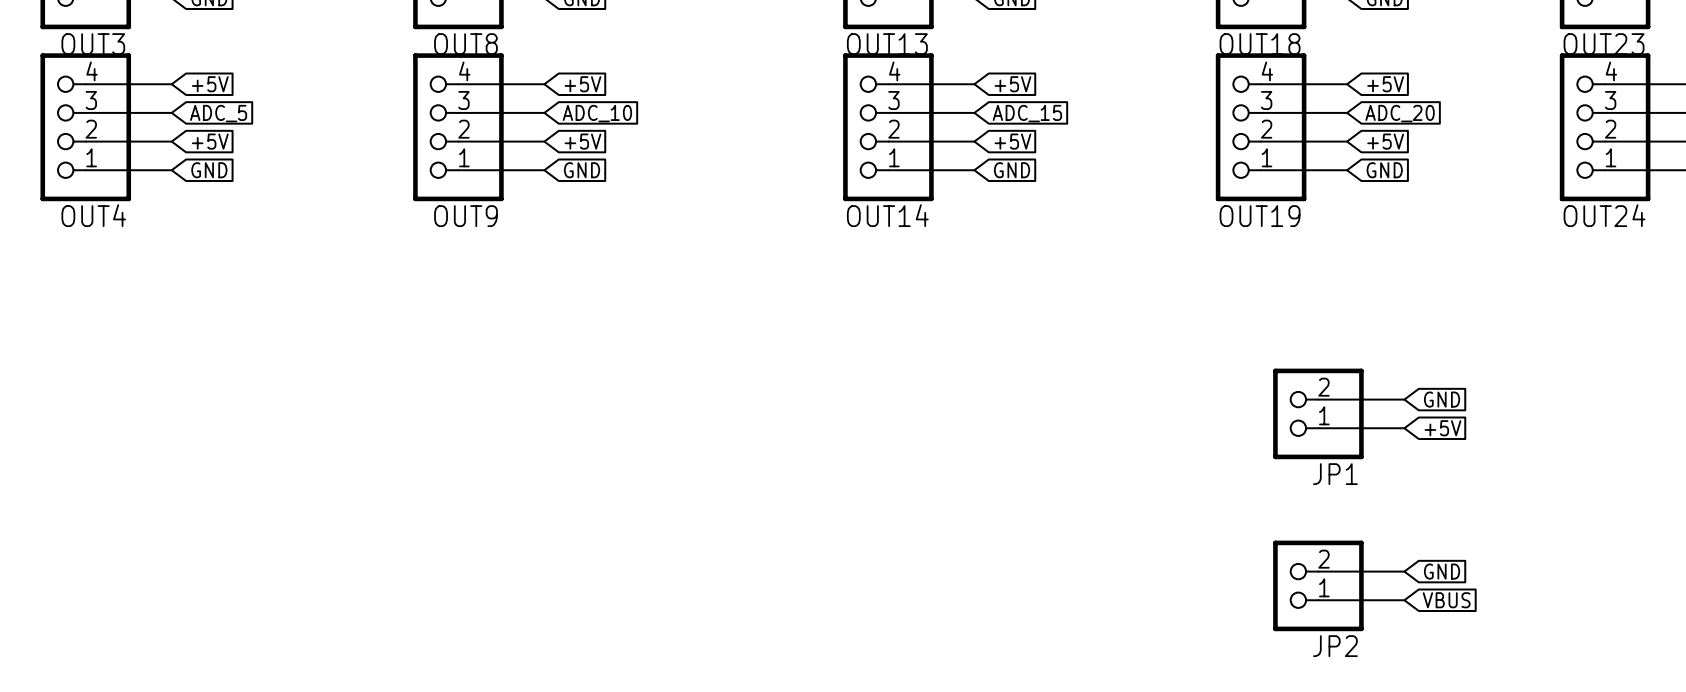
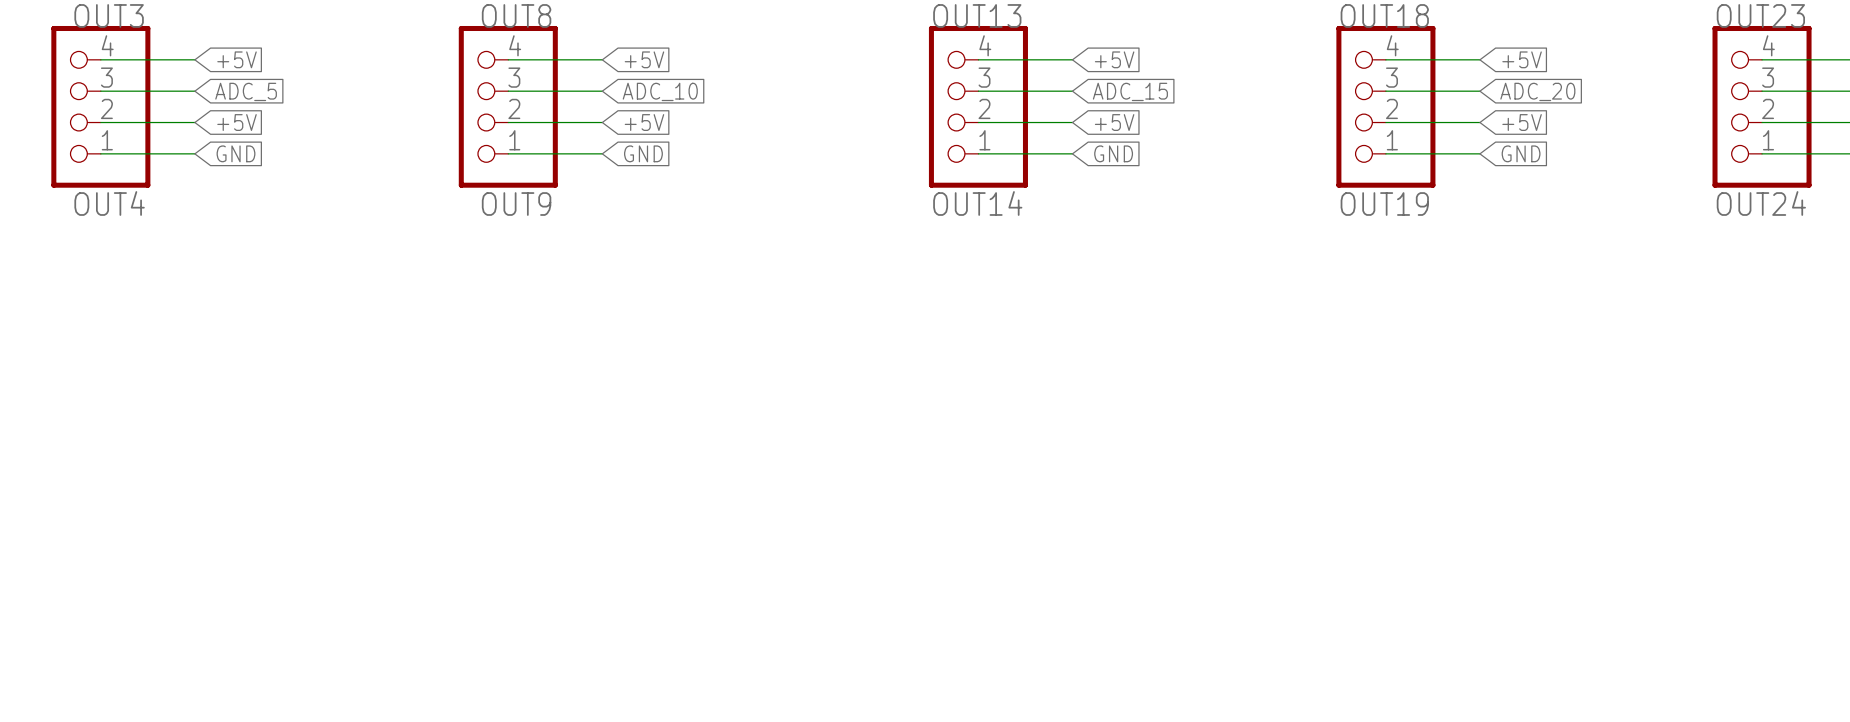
wire: (1318, 399) (1404, 399) -> none
global label: GND (1442, 399) -> none
JP1: (1318, 413) -> none
wire: (1318, 428) (1404, 428) -> none
global label: +5V (1442, 428) -> none
wire: (1318, 571) (1404, 571) -> none
global label: GND (1442, 571) -> none
JP2: (1318, 585) -> none
wire: (1318, 600) (1404, 600) -> none
global label: VBUS (1446, 600) -> none

